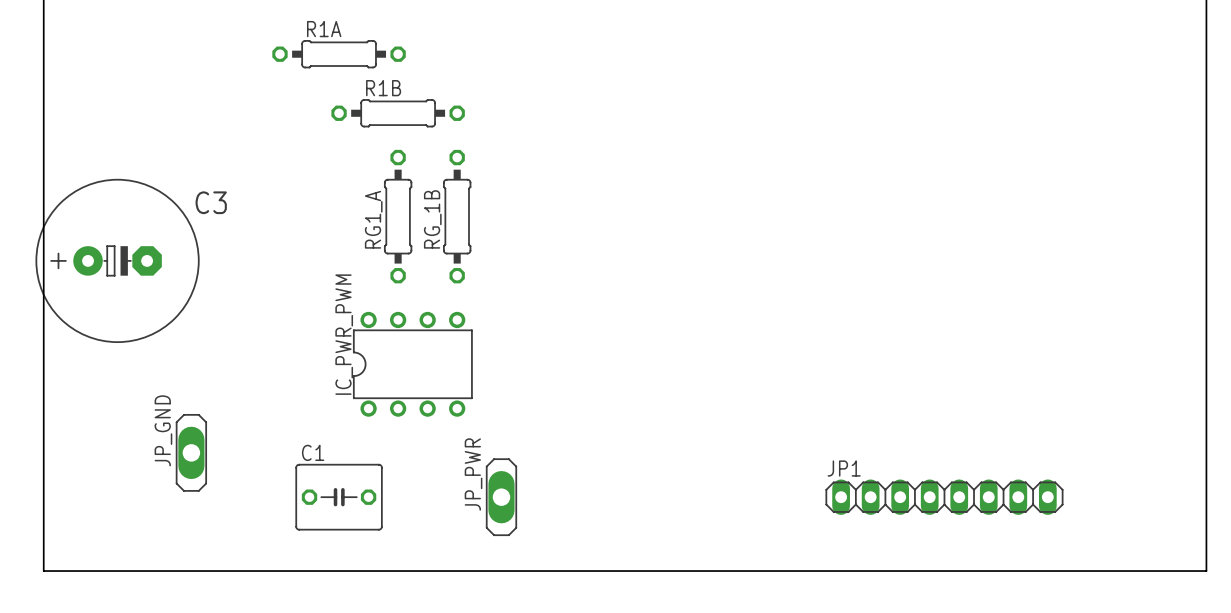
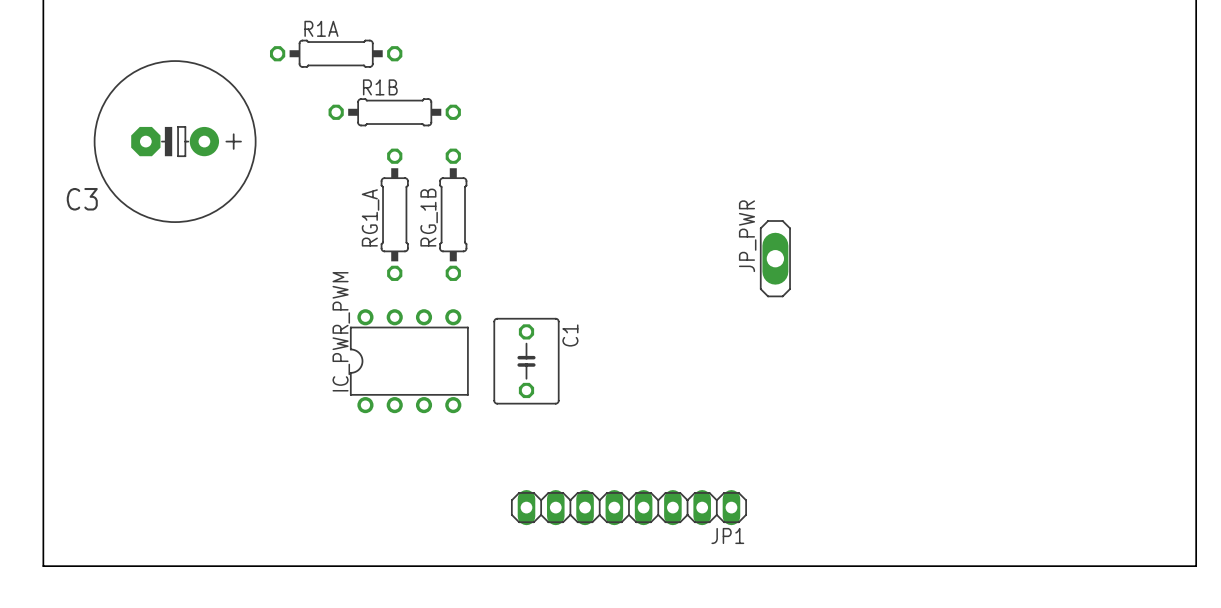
C3 rotation: 0° (117, 260) -> 180° (175, 141)
C3 position: (117, 260) -> (175, 141)
JP_PWR: none -> (775, 258)
JP_GND: (191, 452) -> none
JP1 name position: JP1 (844, 468) -> JP1 (727, 535)
C1 rotation: 0° (339, 497) -> 90° clockwise (526, 361)
C1 position: (339, 497) -> (526, 361)
JP_PWR: (501, 497) -> none
JP1 position: (944, 497) -> (628, 507)

